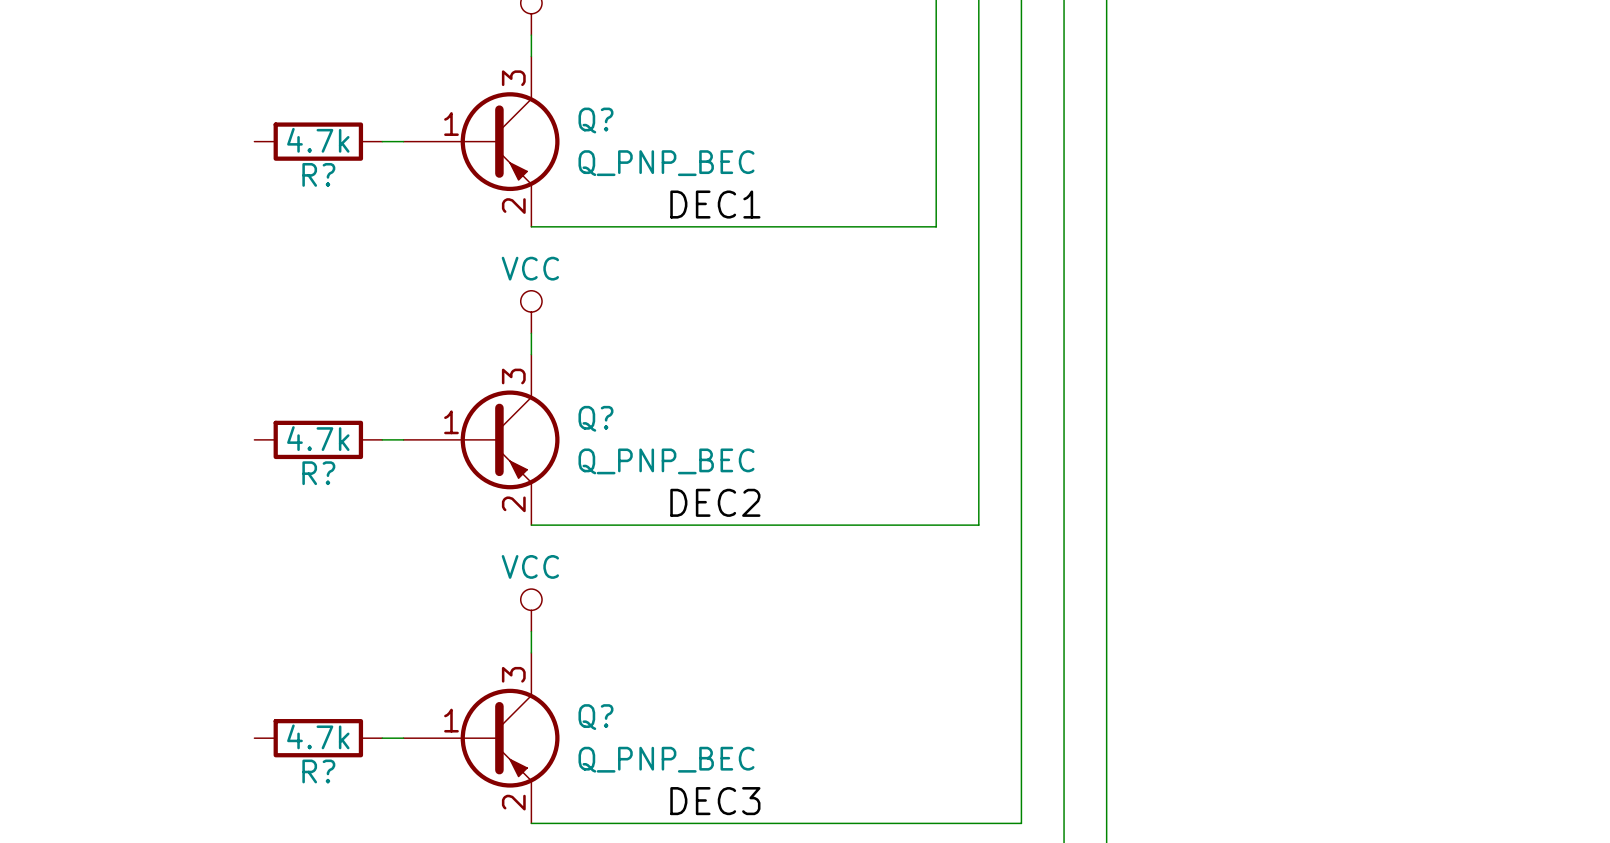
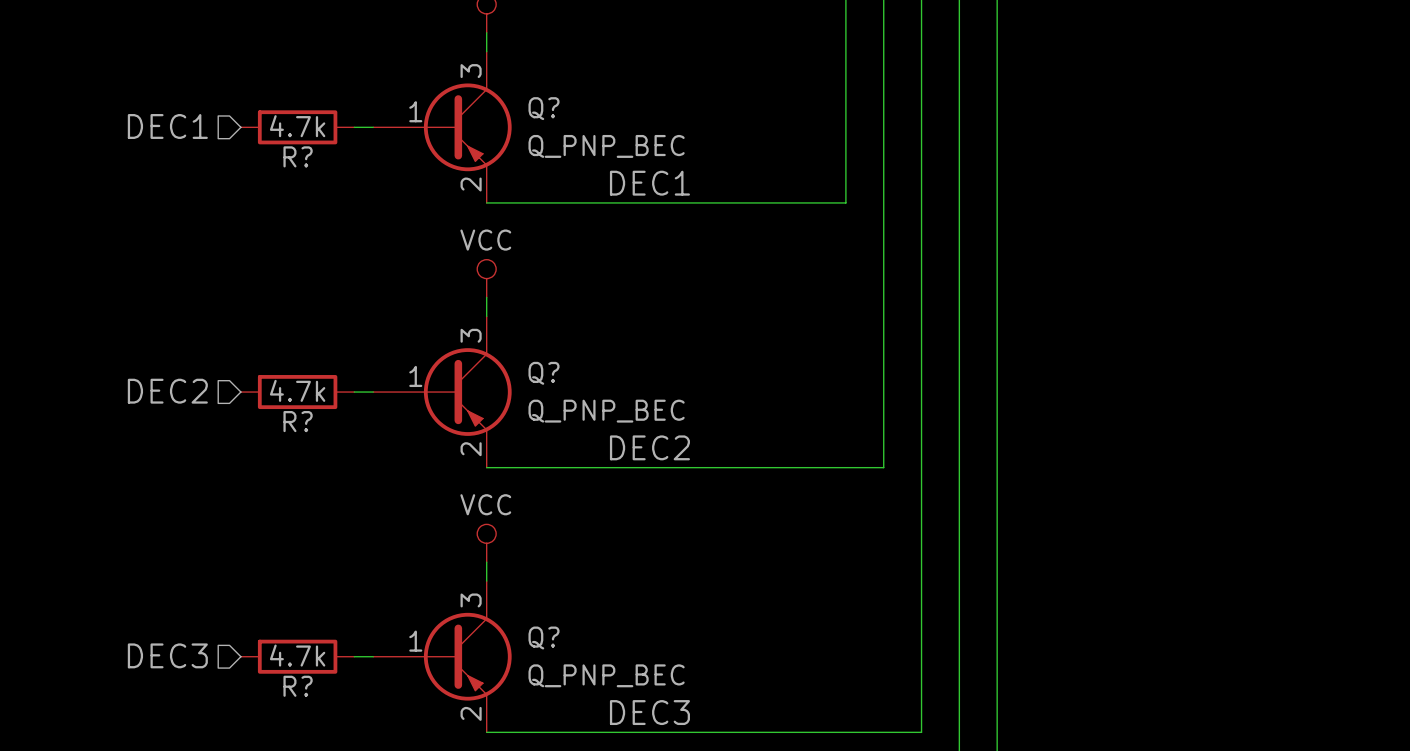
hierarchical label: none -> DEC1 (167, 126)
hierarchical label: none -> DEC2 (167, 391)
hierarchical label: none -> DEC3 (167, 655)

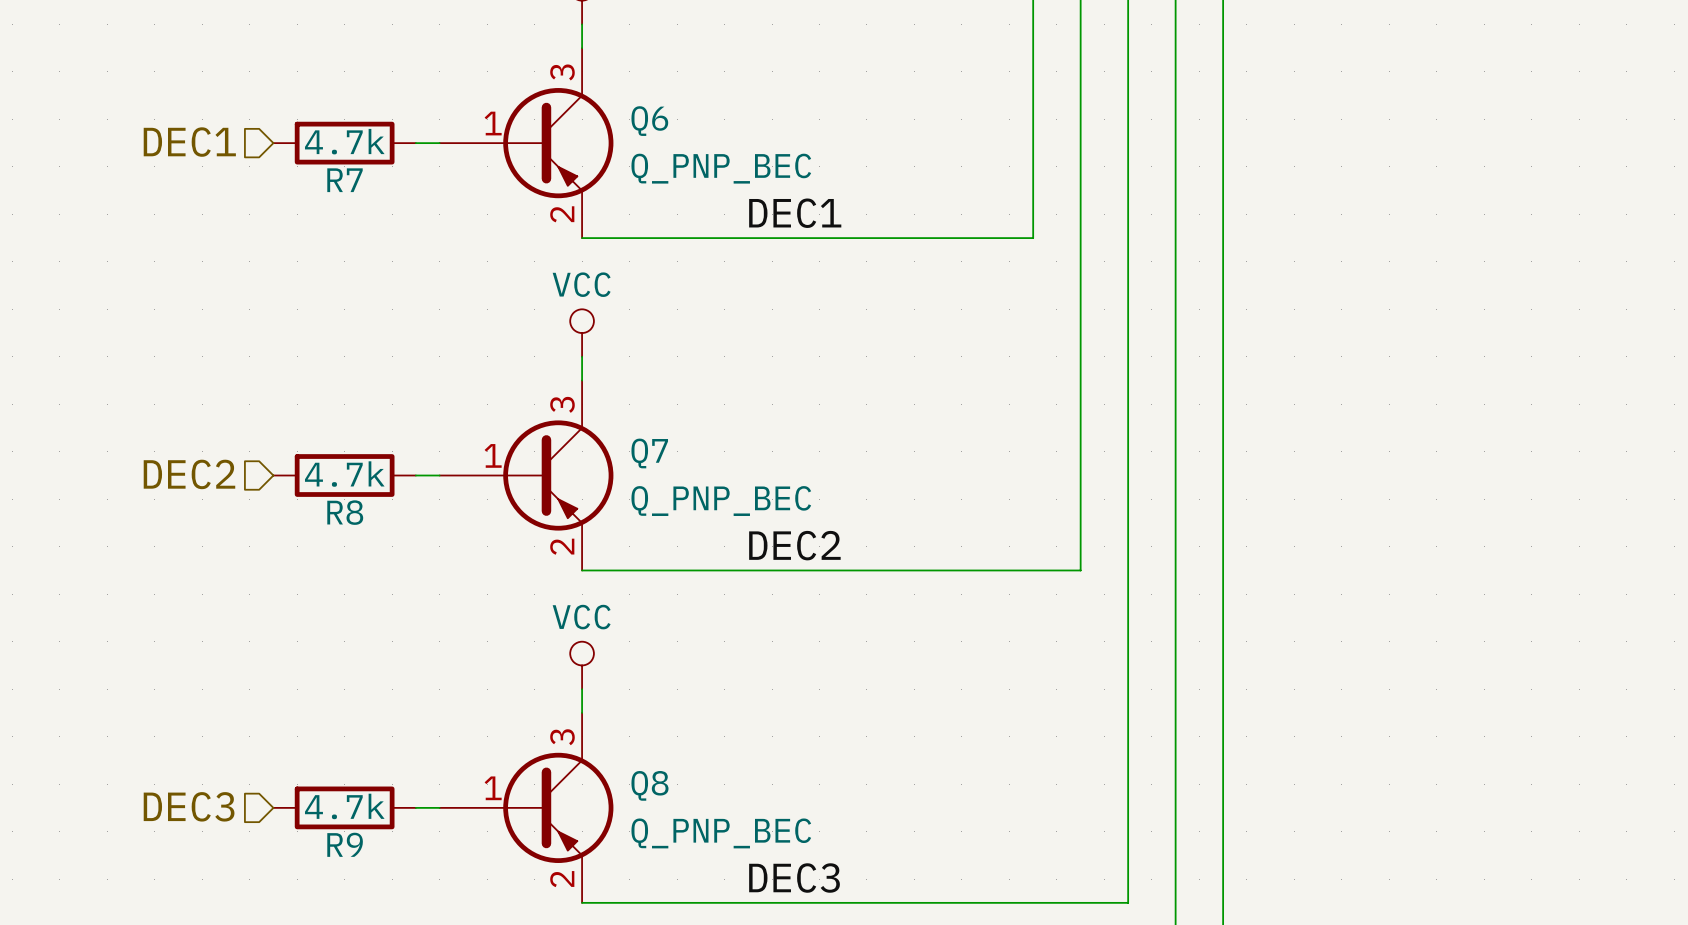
Q? name: Q? (543, 108) -> Q6 (649, 121)
R? name: R? (298, 156) -> R7 (345, 180)
Q? name: Q? (543, 373) -> Q7 (649, 453)
R? name: R? (298, 421) -> R8 (345, 512)
Q? name: Q? (543, 638) -> Q8 (649, 785)
R? name: R? (298, 686) -> R9 (345, 844)

